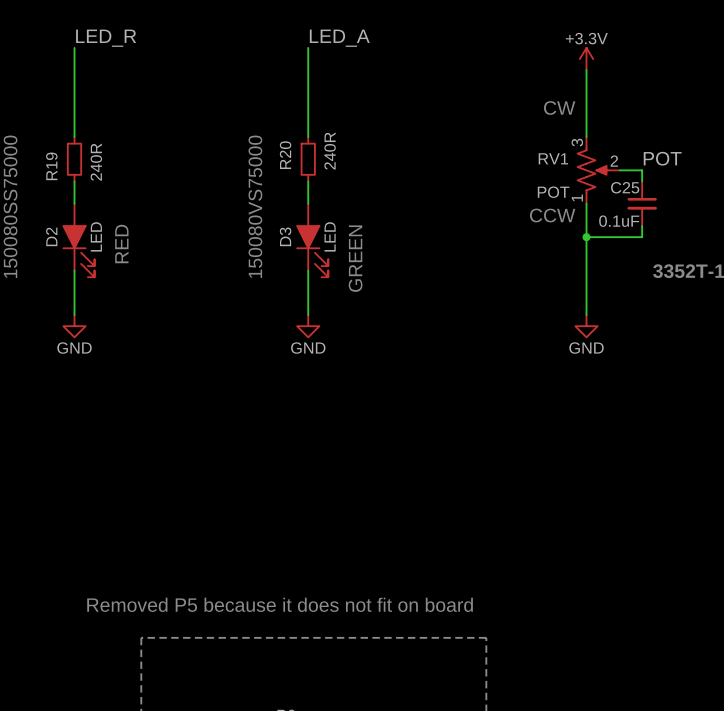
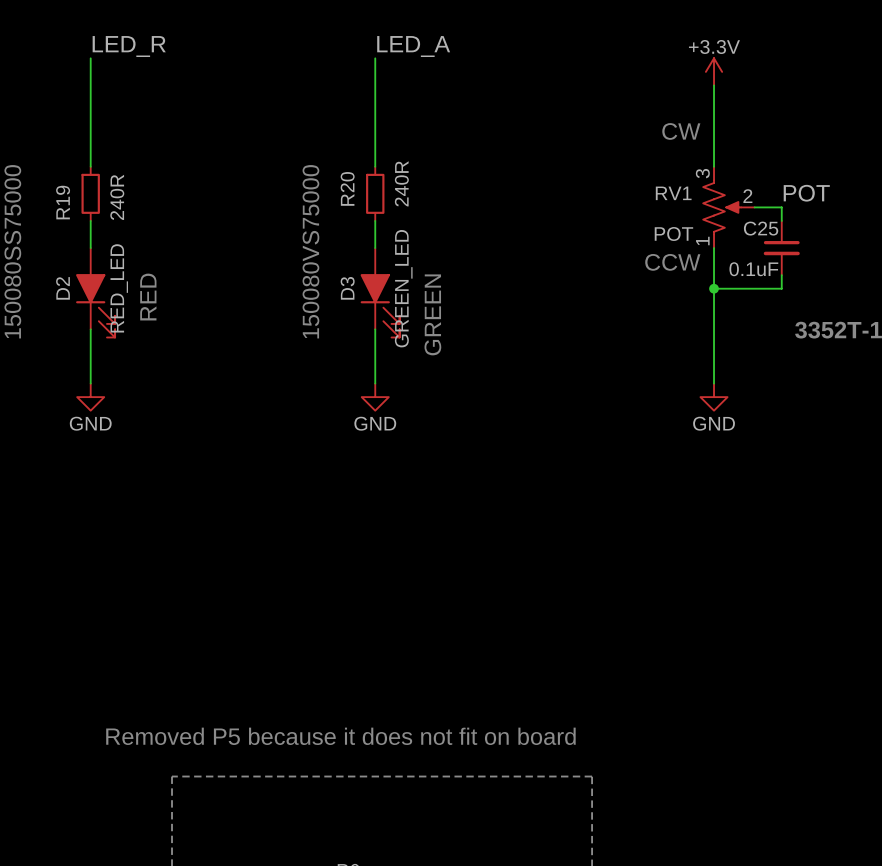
D2 value: LED (96, 236) -> RED_LED (119, 288)
D3 value: LED (330, 236) -> GREEN_LED (403, 288)

